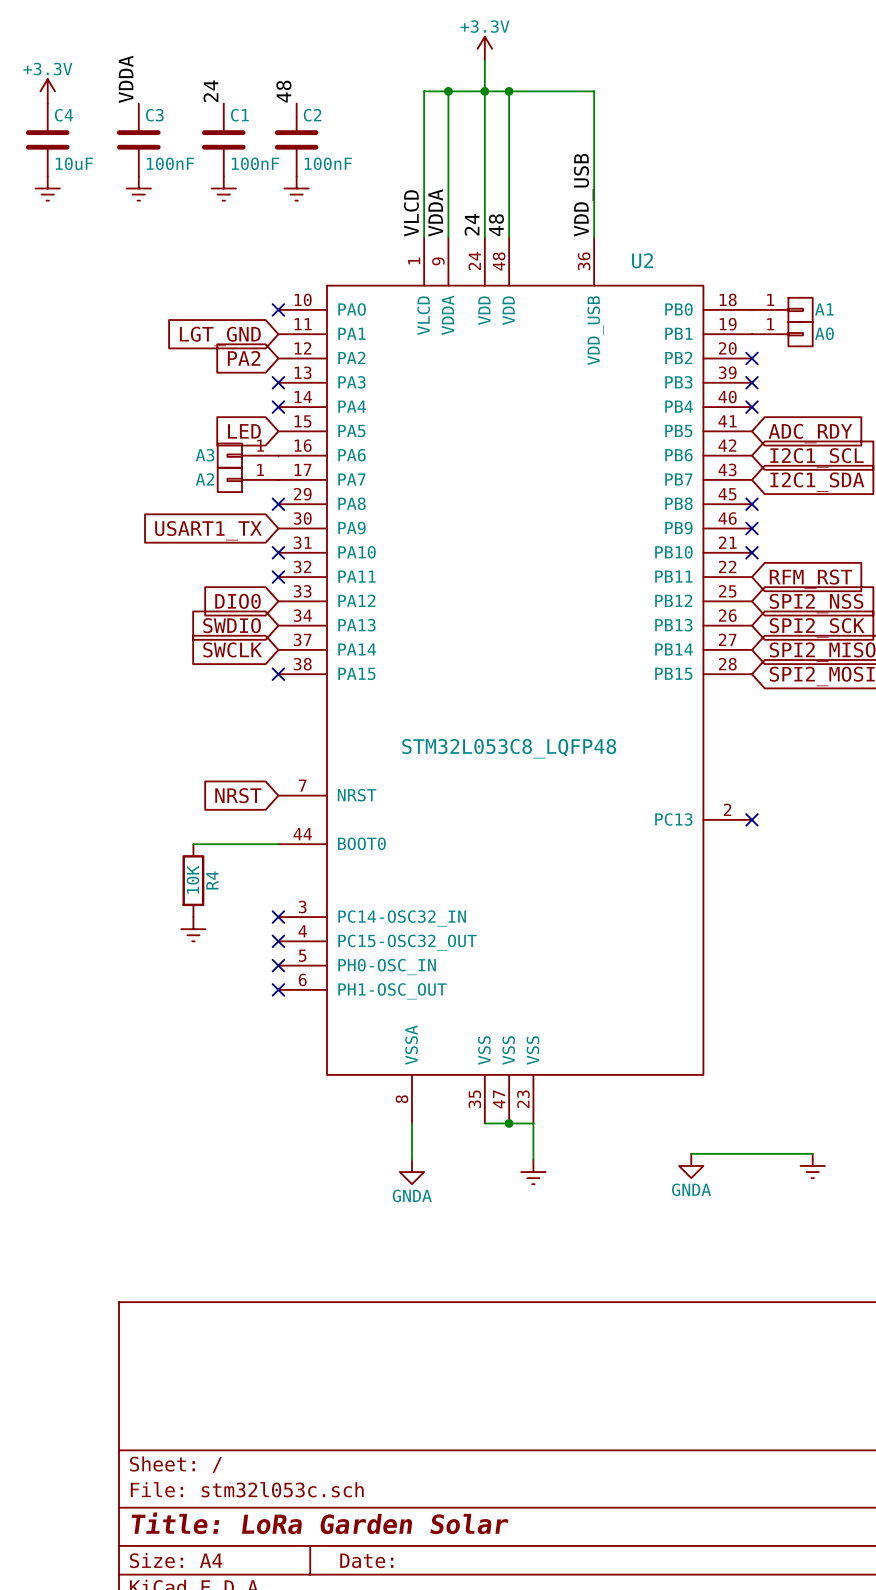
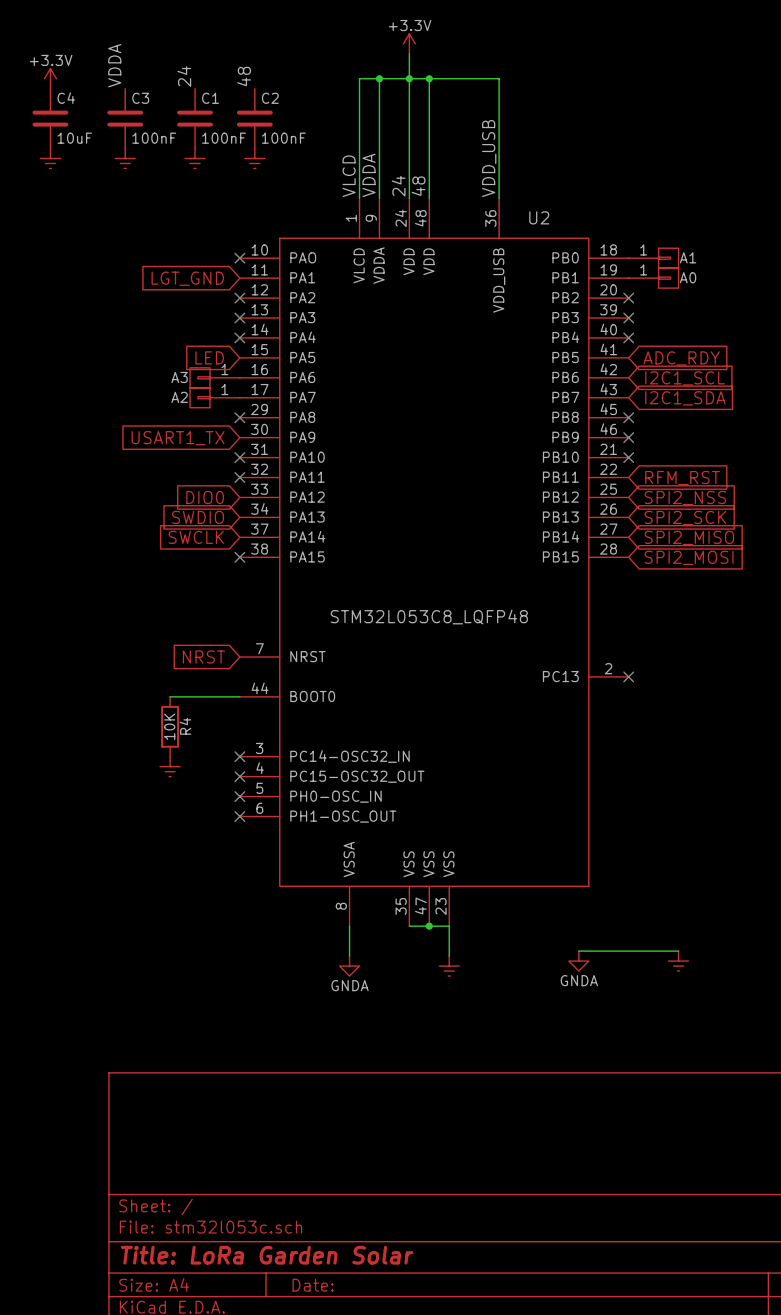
global label: PA2 (244, 358) -> none
no-connect mark: none -> (239, 298)

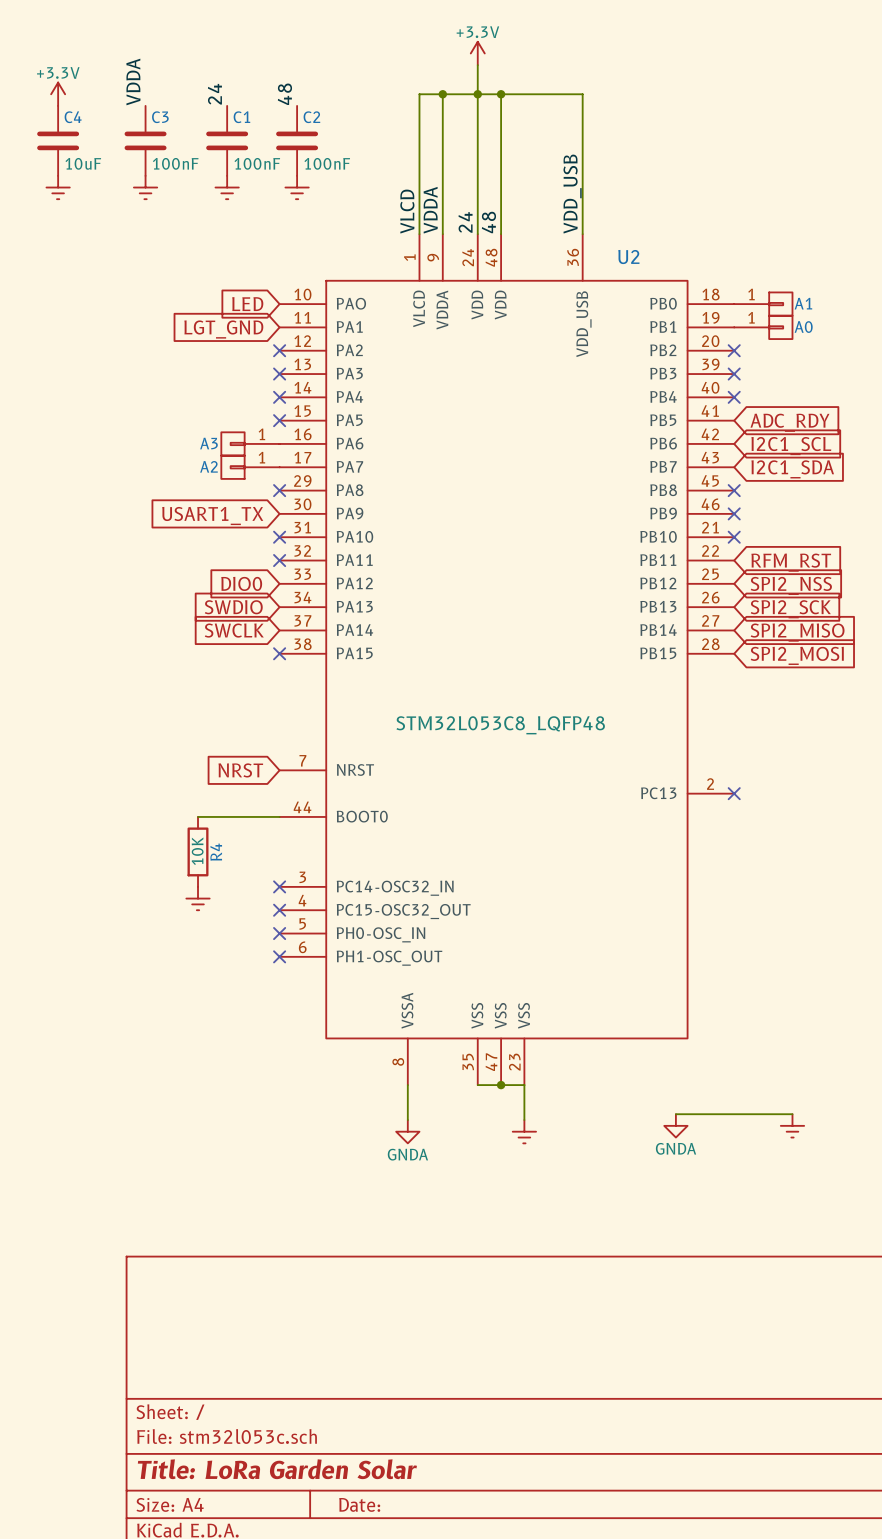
no-connect mark: (239, 258) -> none
global label position: LED (209, 357) -> LED (247, 304)
no-connect mark: none -> (279, 420)

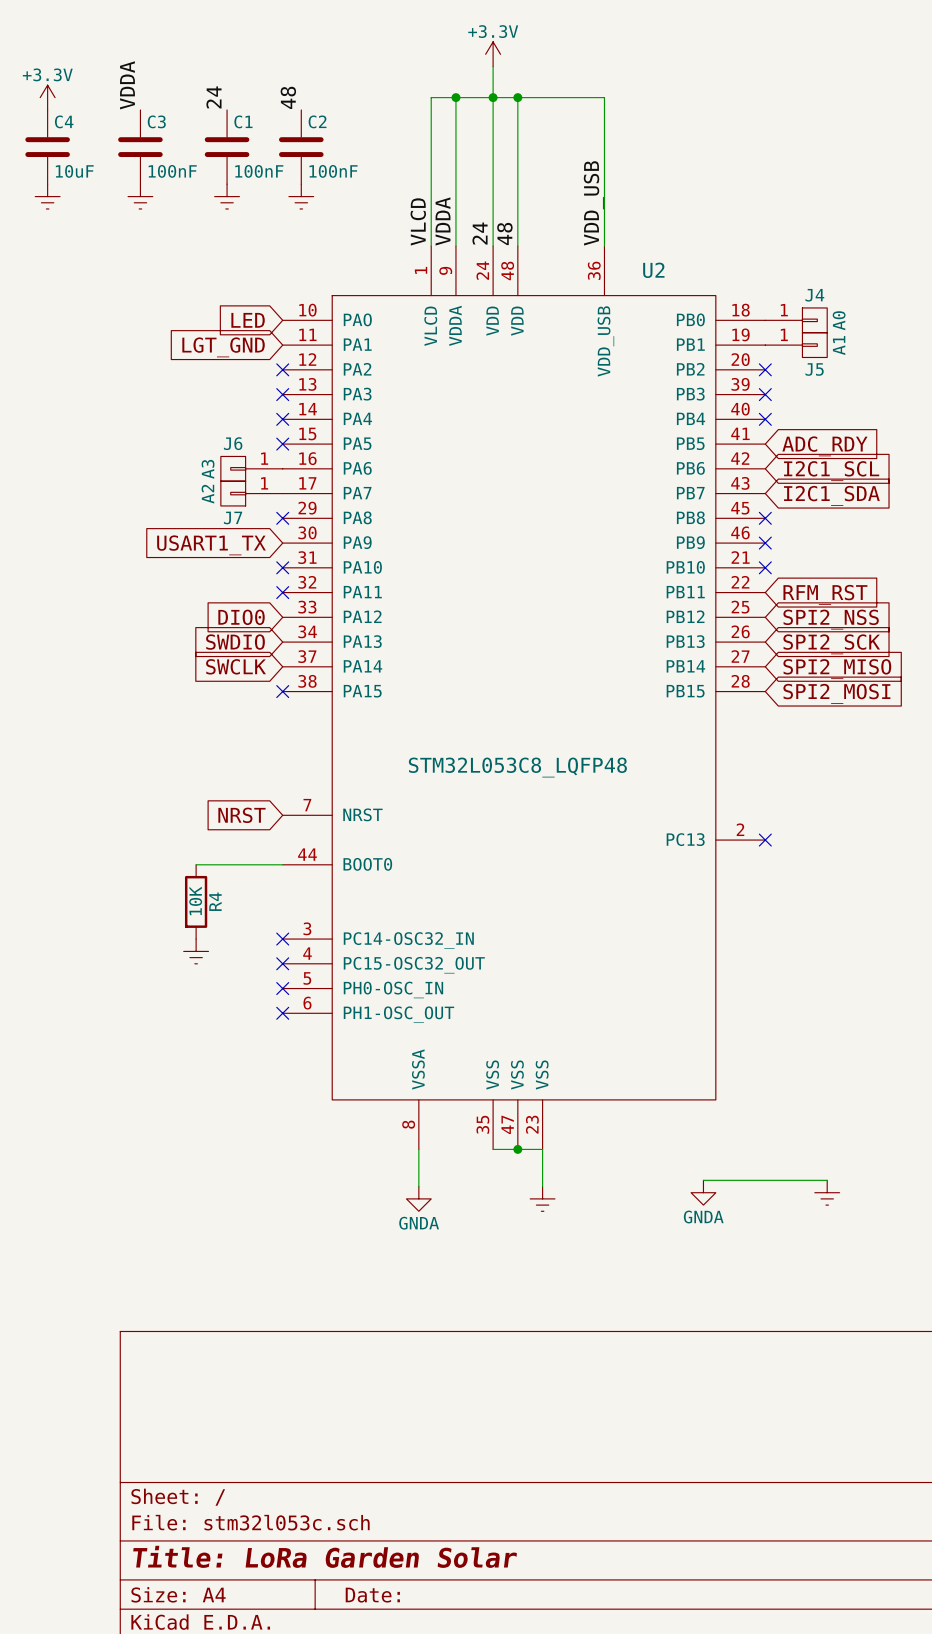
A1 name: A1 (803, 303) -> J4 (814, 295)
A1 value: none -> A0 (839, 320)
A0 name: A0 (803, 327) -> J5 (814, 369)
A0 value: none -> A1 (839, 345)
A3 name: A3 (208, 443) -> J6 (233, 443)
A3 value: none -> A3 (208, 469)
A2 name: A2 (208, 466) -> J7 (233, 517)
A2 value: none -> A2 (207, 494)

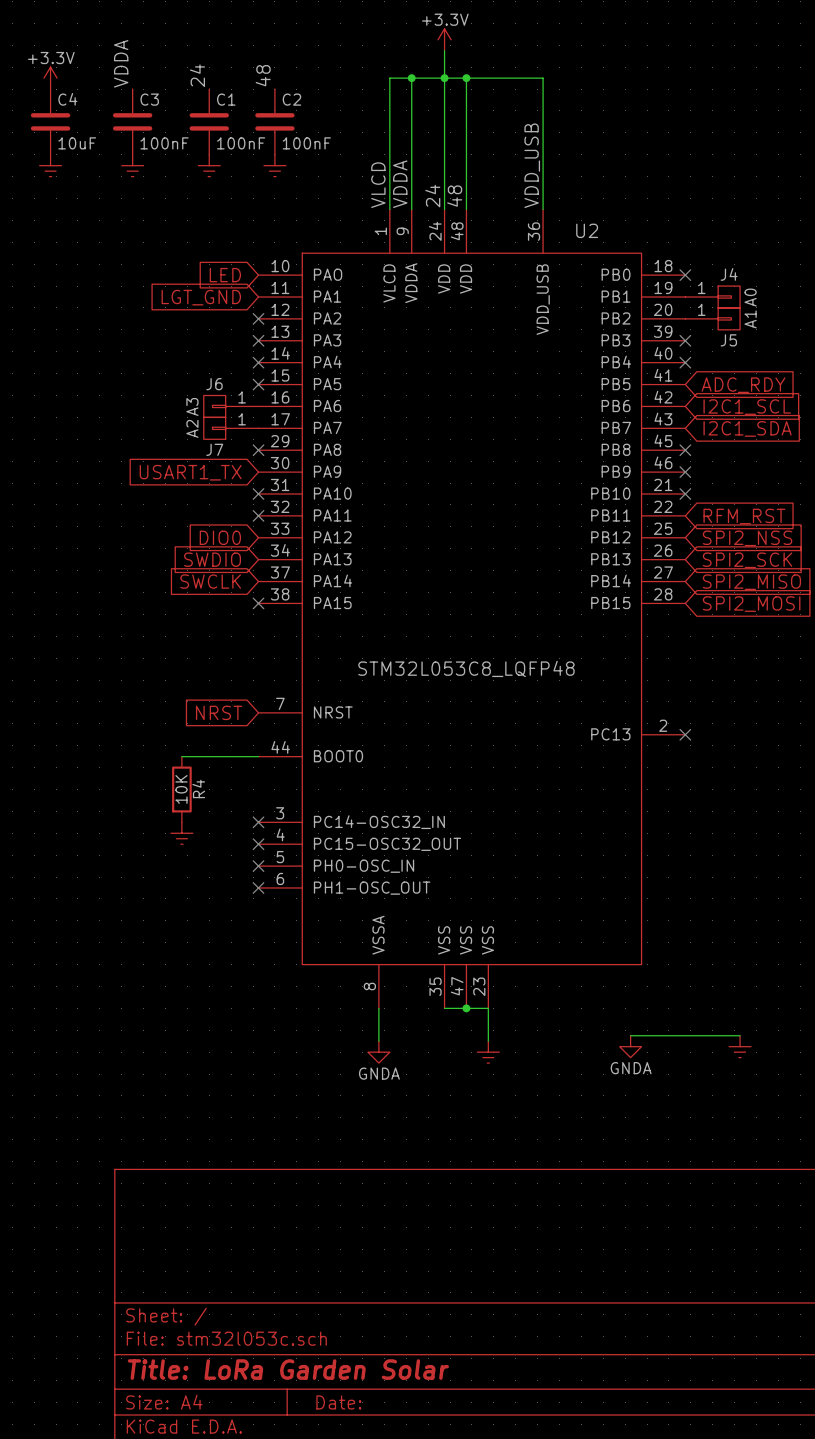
J4: A0 (796, 320) -> none
J5 value: A1 (839, 345) -> A0 (750, 297)
no-connect mark position: (765, 369) -> (685, 275)
J5: none -> A1 (712, 318)
J5 name: J5 (814, 369) -> J4 (729, 274)

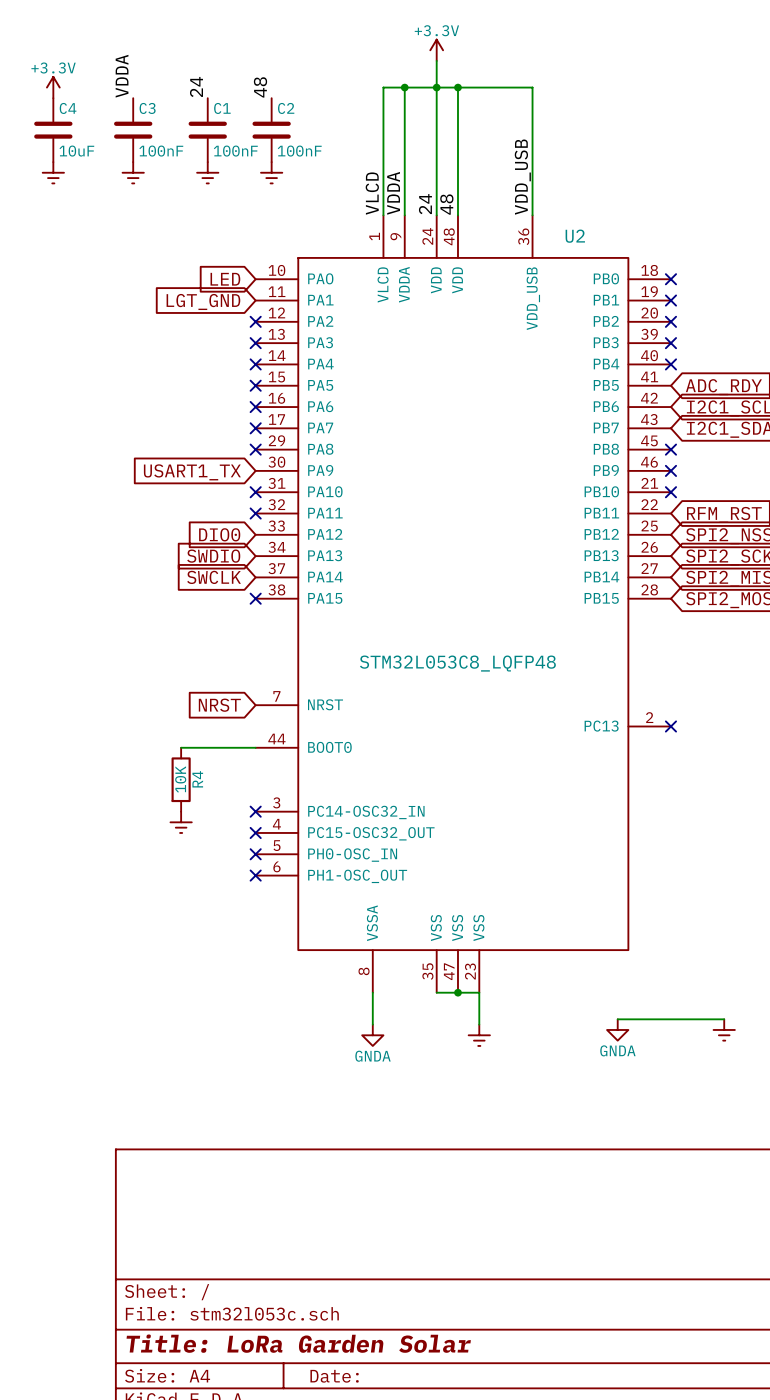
no-connect mark: none -> (670, 300)
J4: A0 (712, 297) -> none
no-connect mark: none -> (670, 321)
J5: A1 (712, 318) -> none
J6: A3 (231, 406) -> none
no-connect mark: none -> (255, 407)
J7: A2 (231, 428) -> none
no-connect mark: none -> (255, 428)

